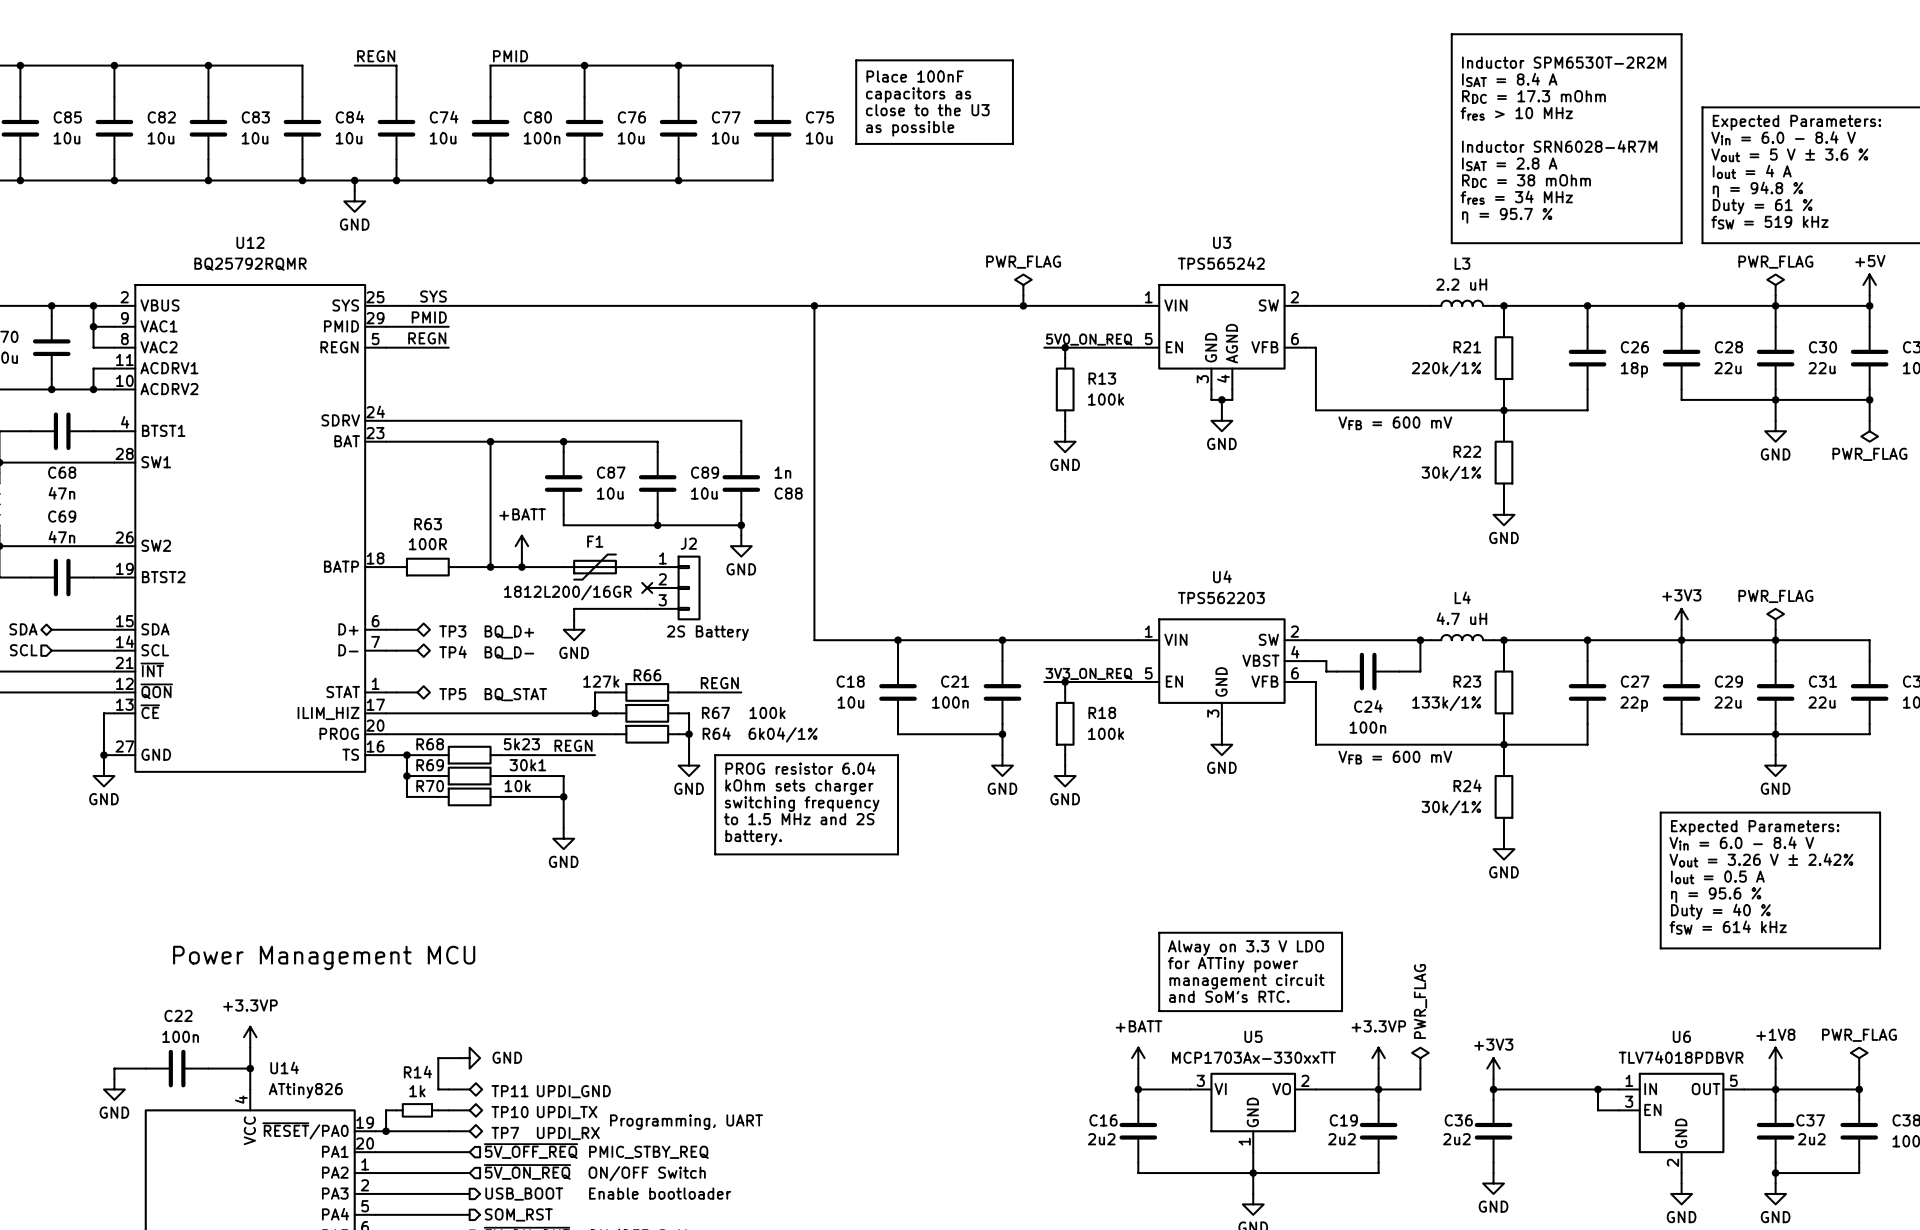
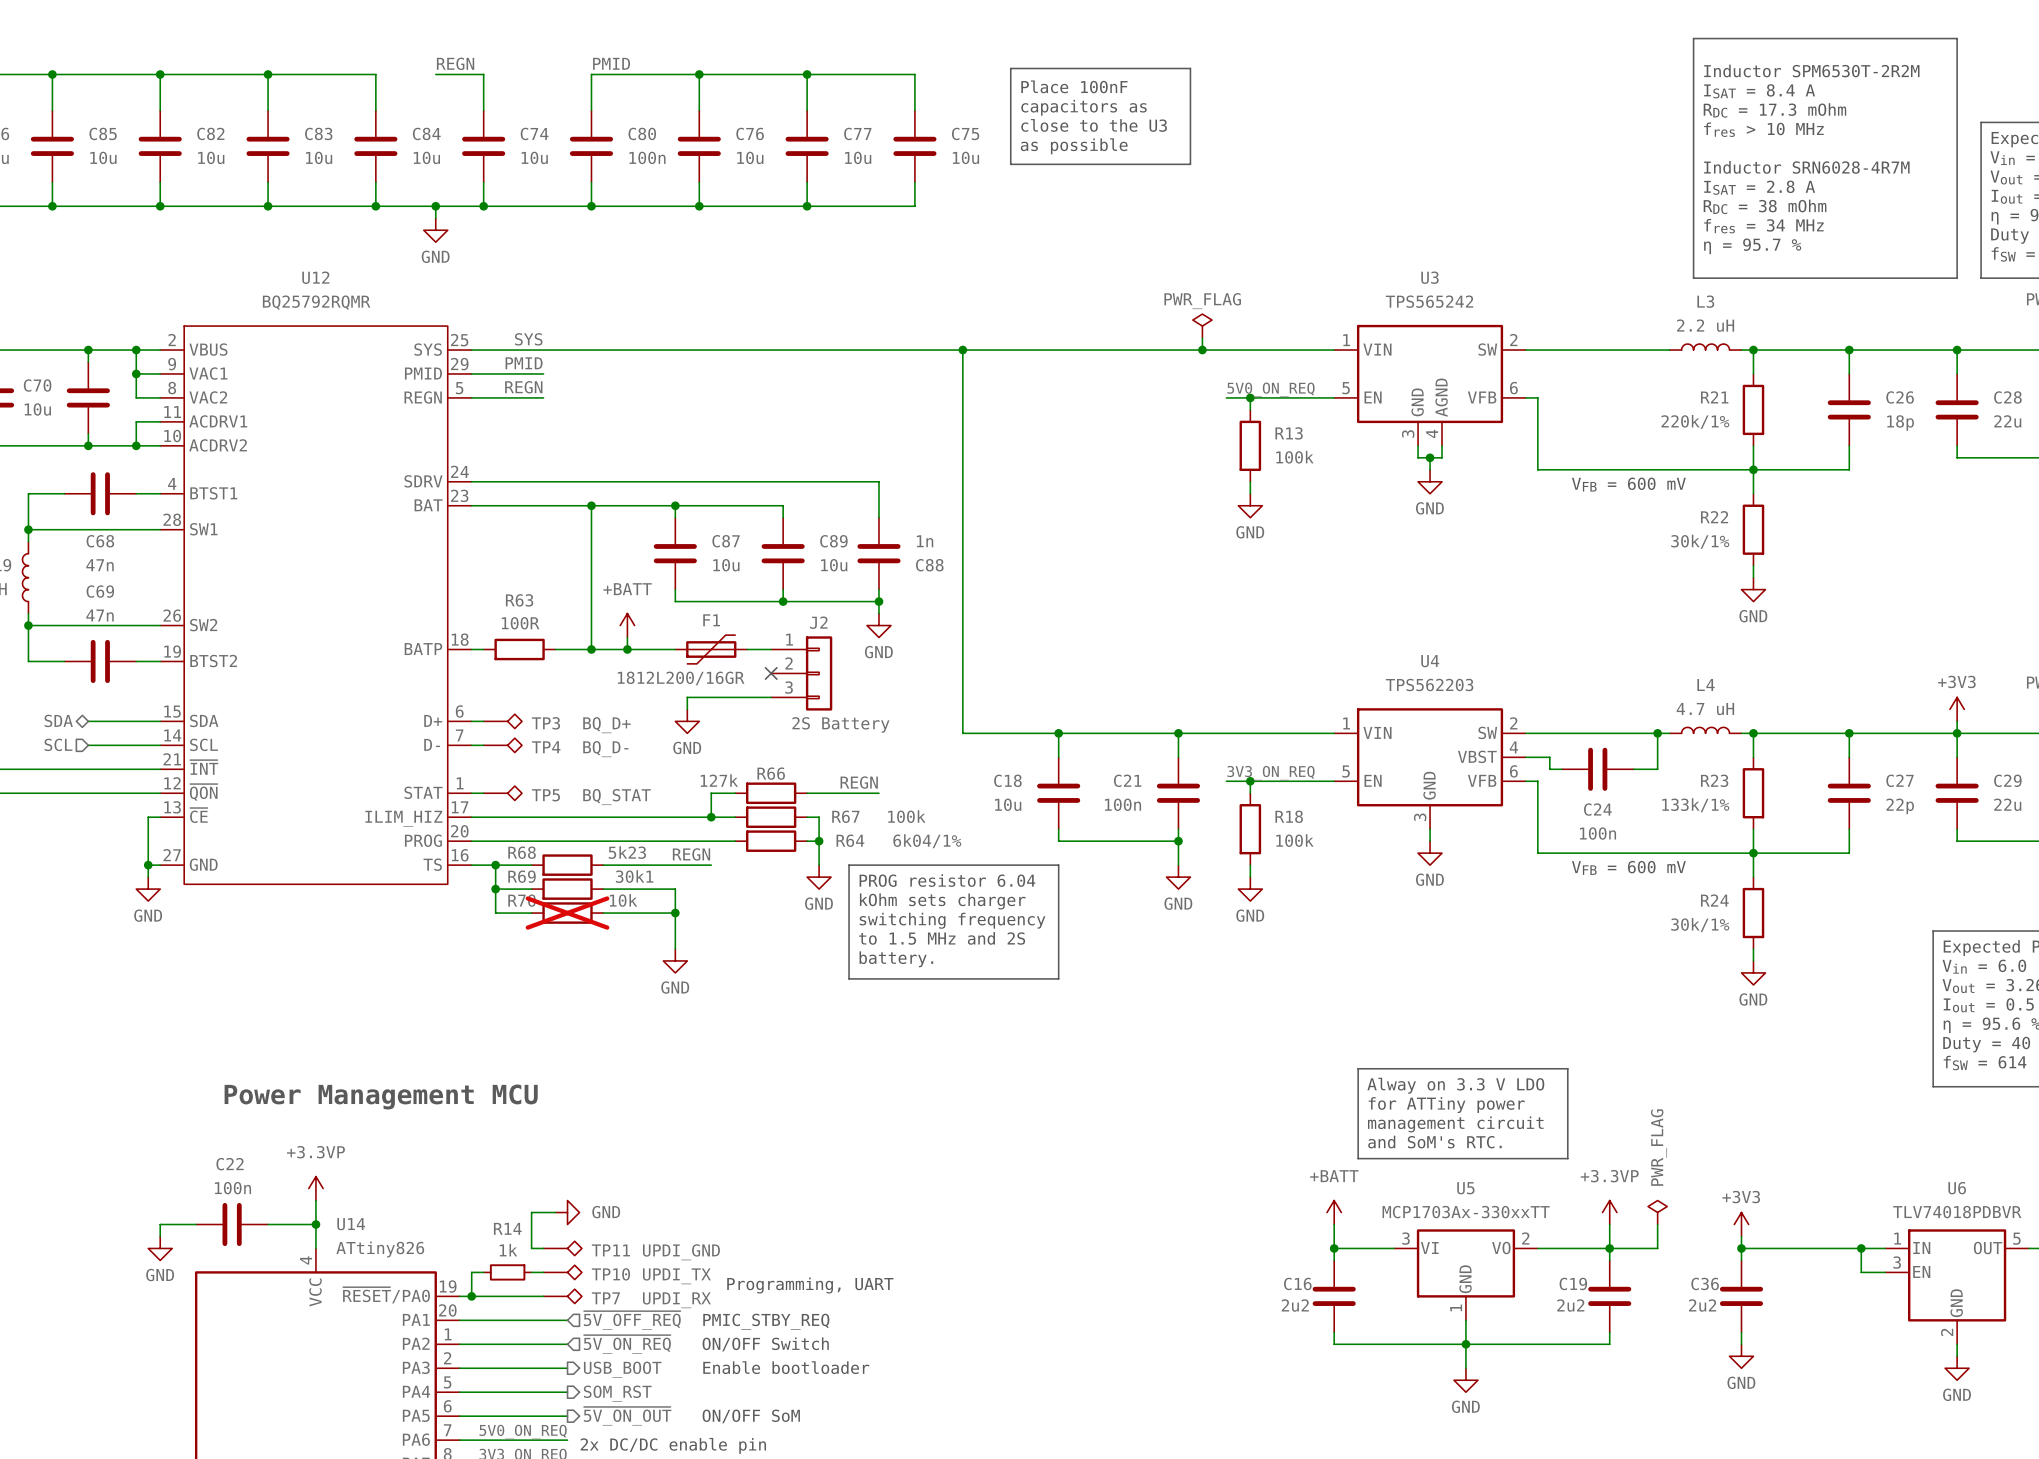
R70 do-not-place cross: none -> (567, 913)

